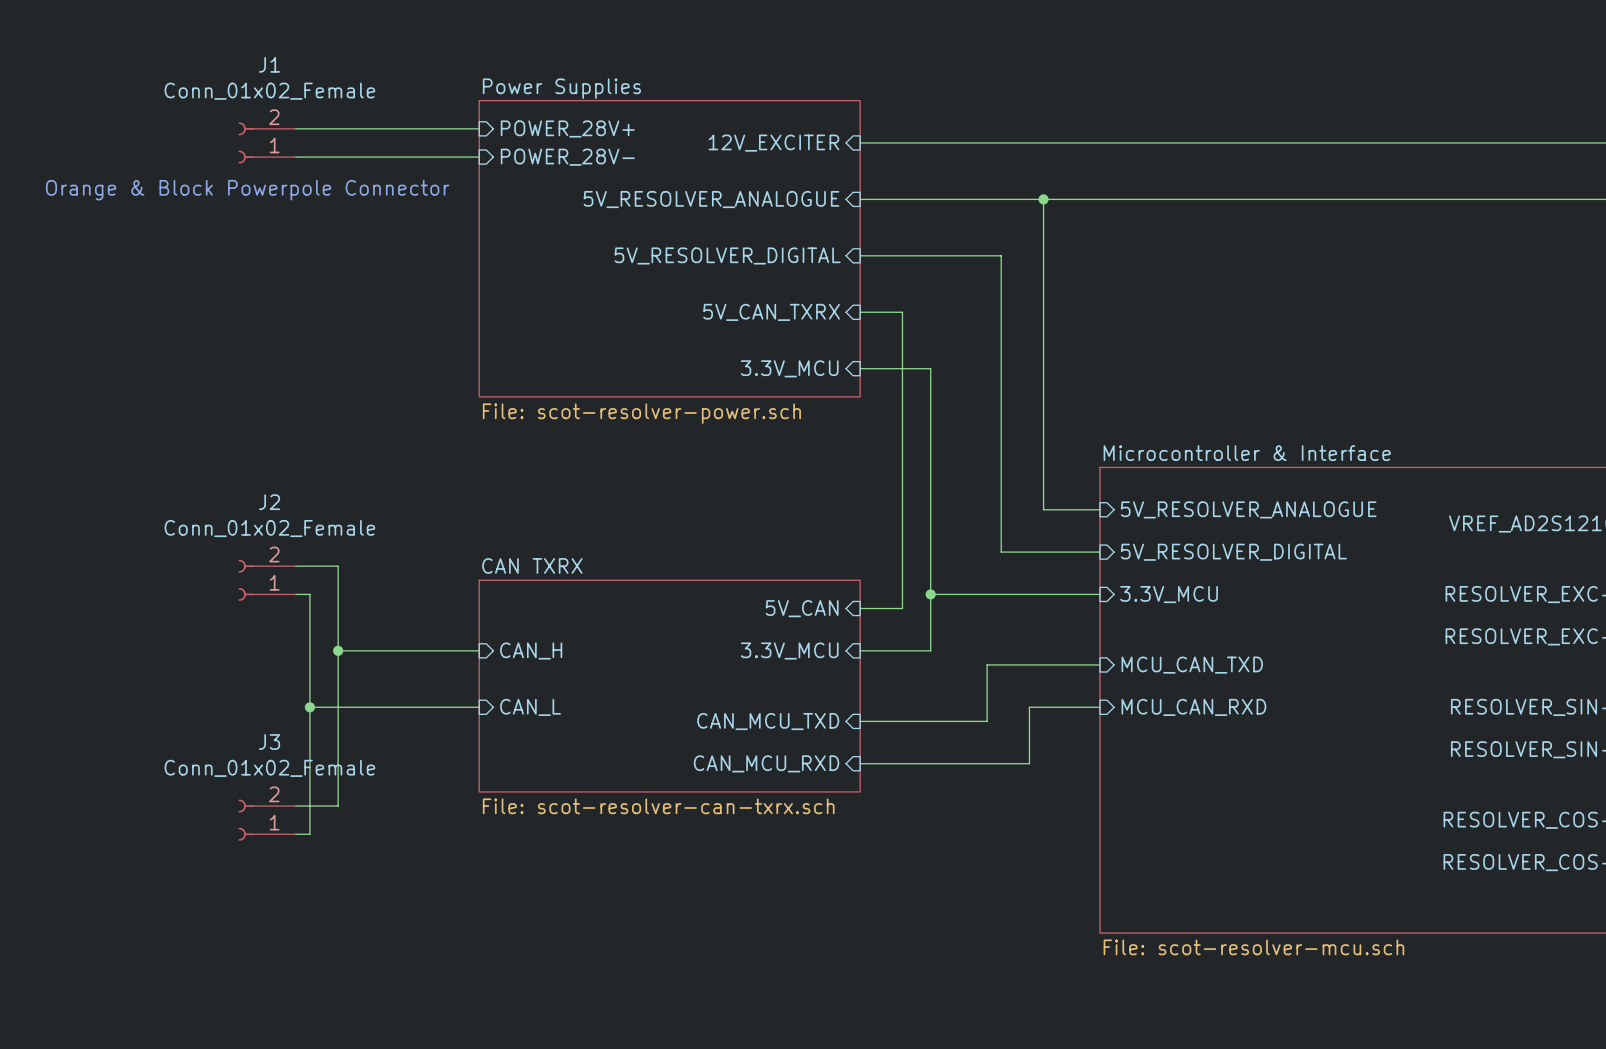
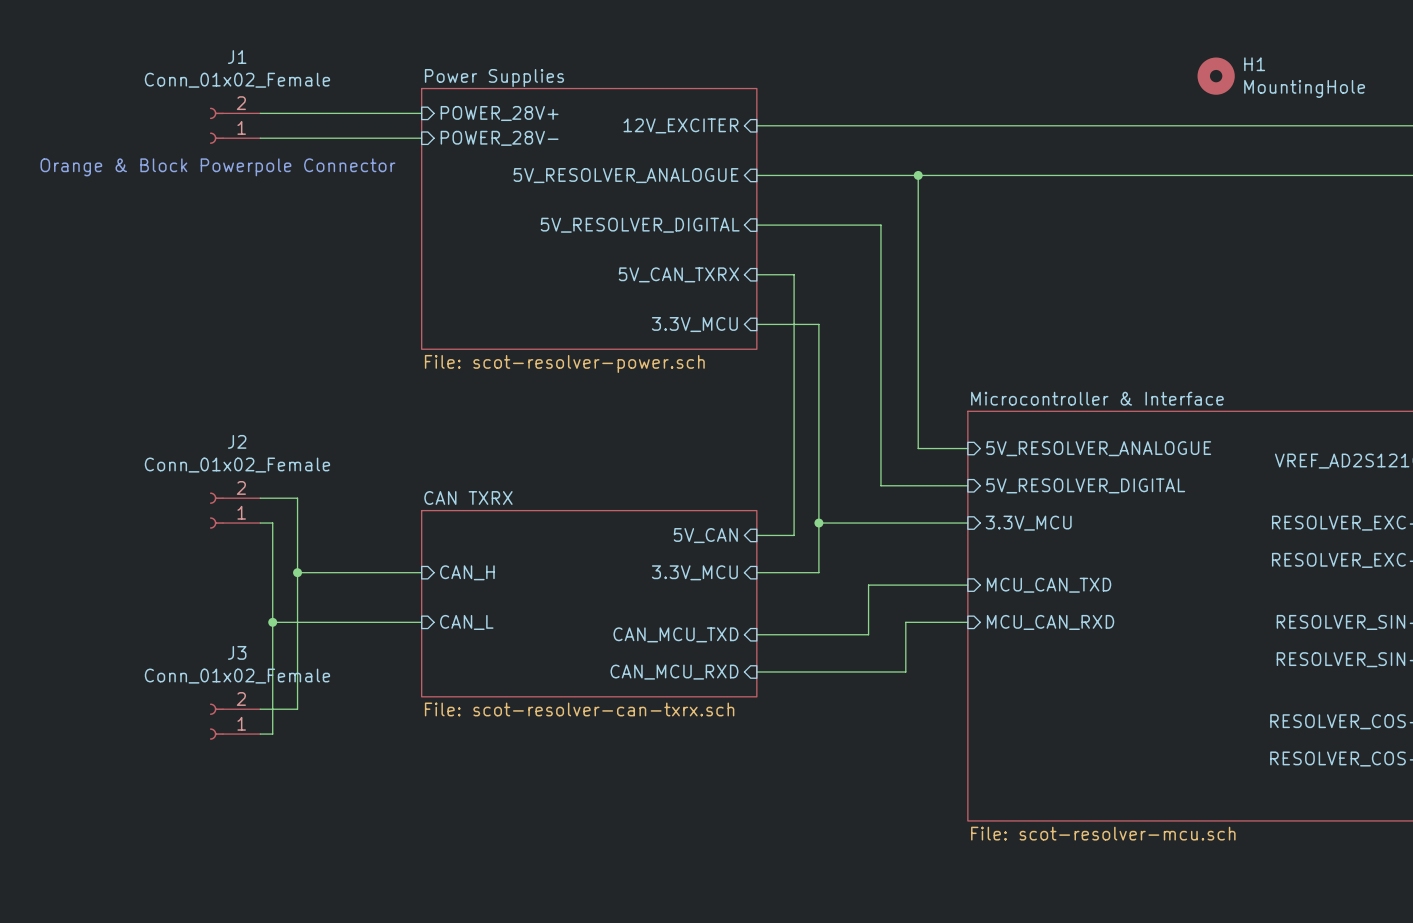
H1: none -> MountingHole (1216, 76)

